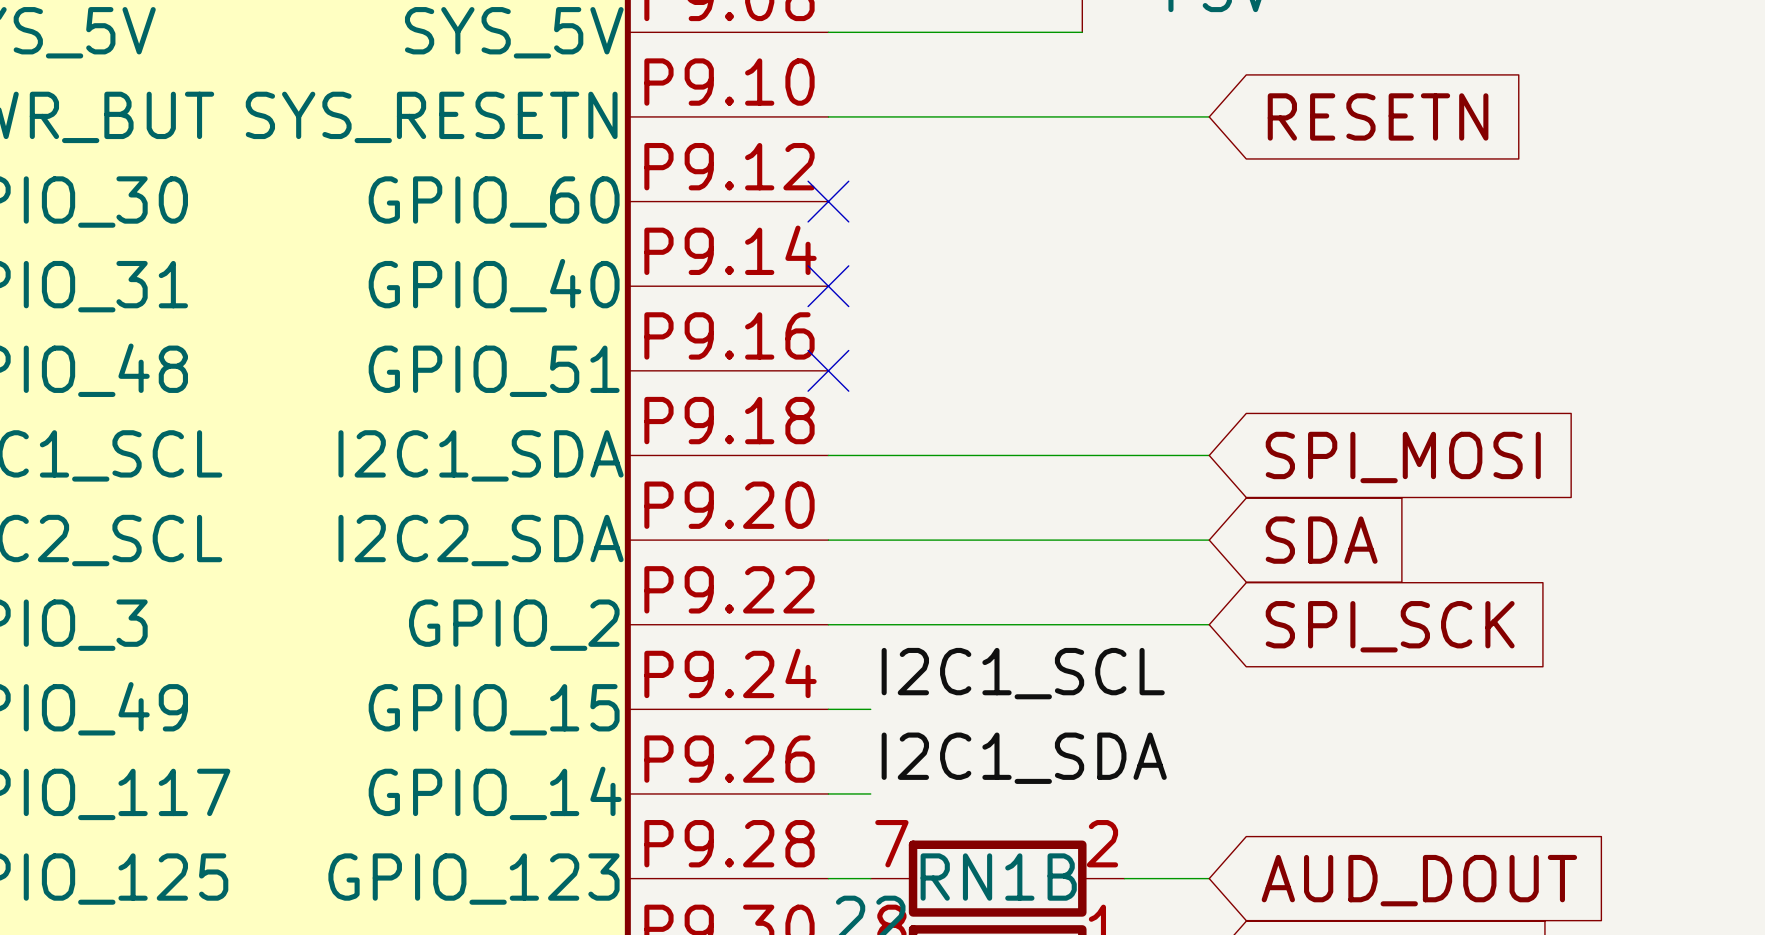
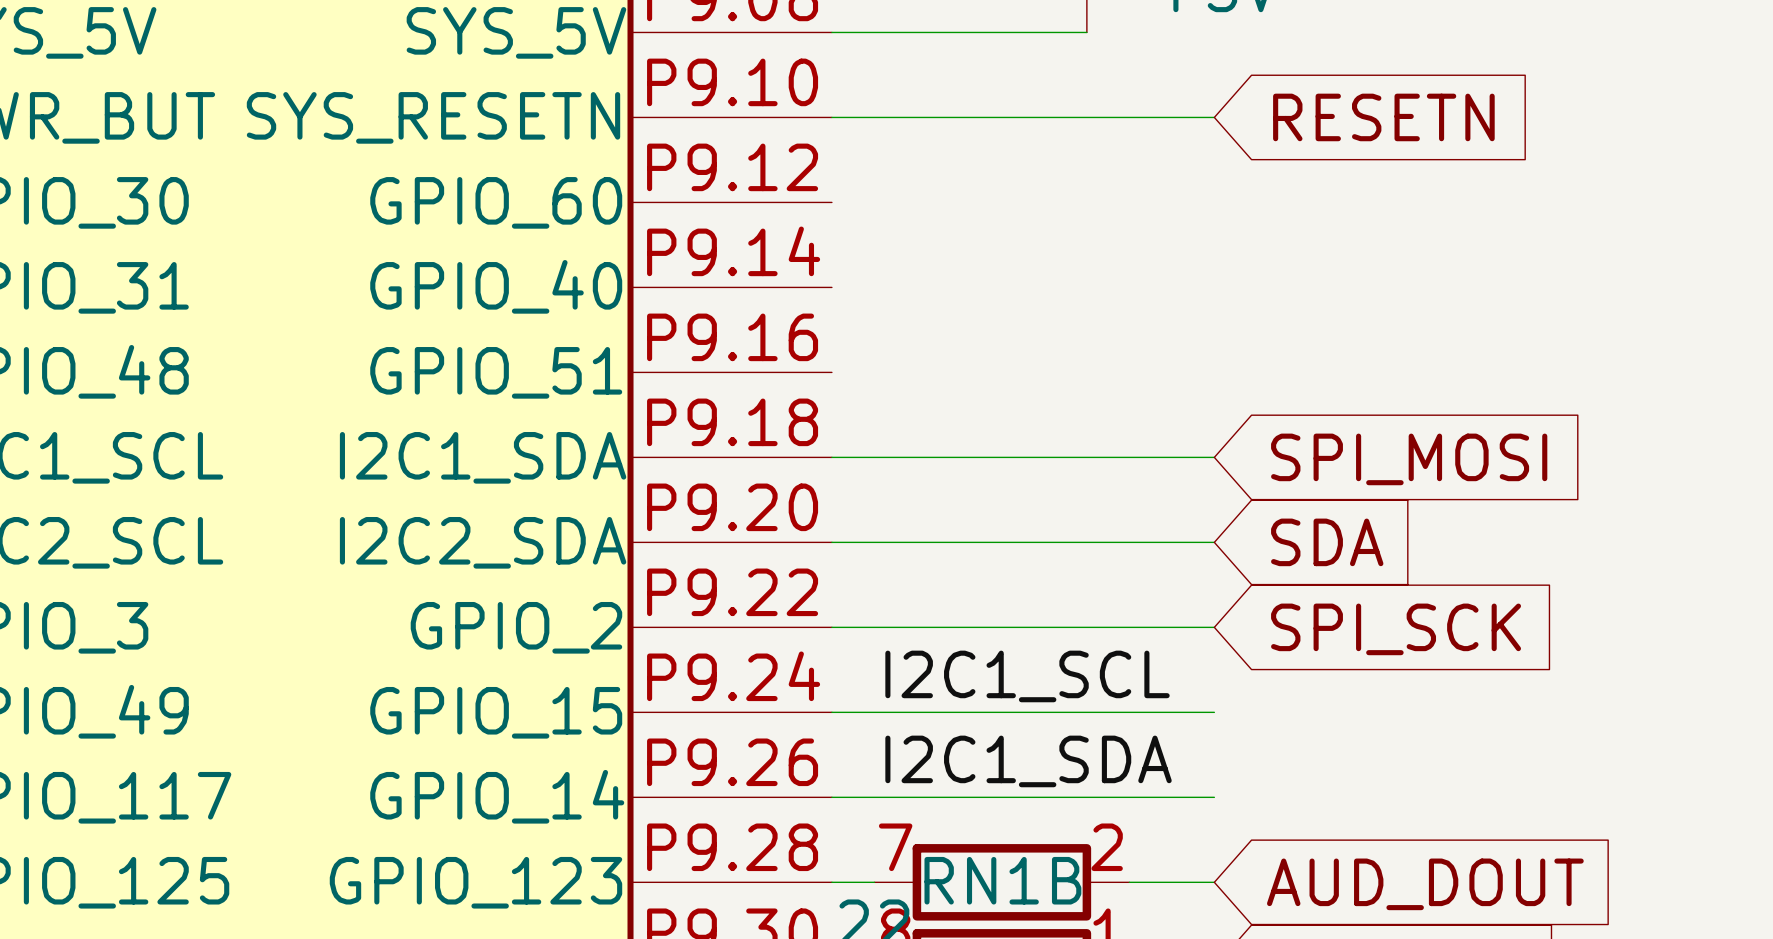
no-connect mark: (828, 201) -> none
no-connect mark: (828, 286) -> none
no-connect mark: (828, 370) -> none
wire: none -> (874, 712) (1214, 712)
wire: none -> (874, 797) (1214, 797)

